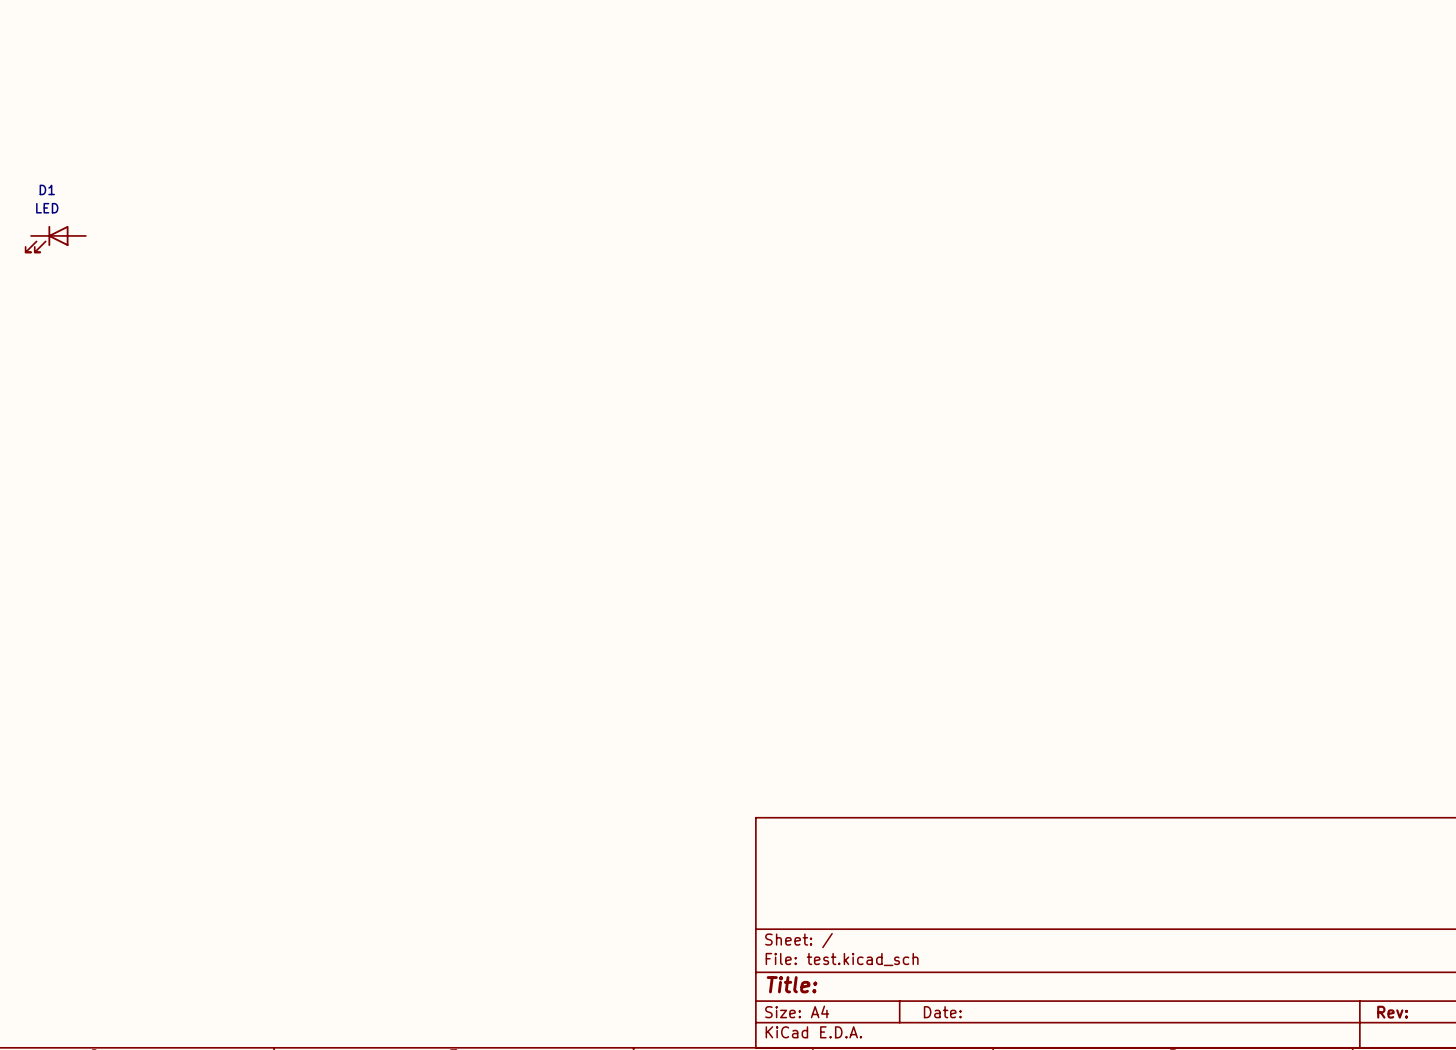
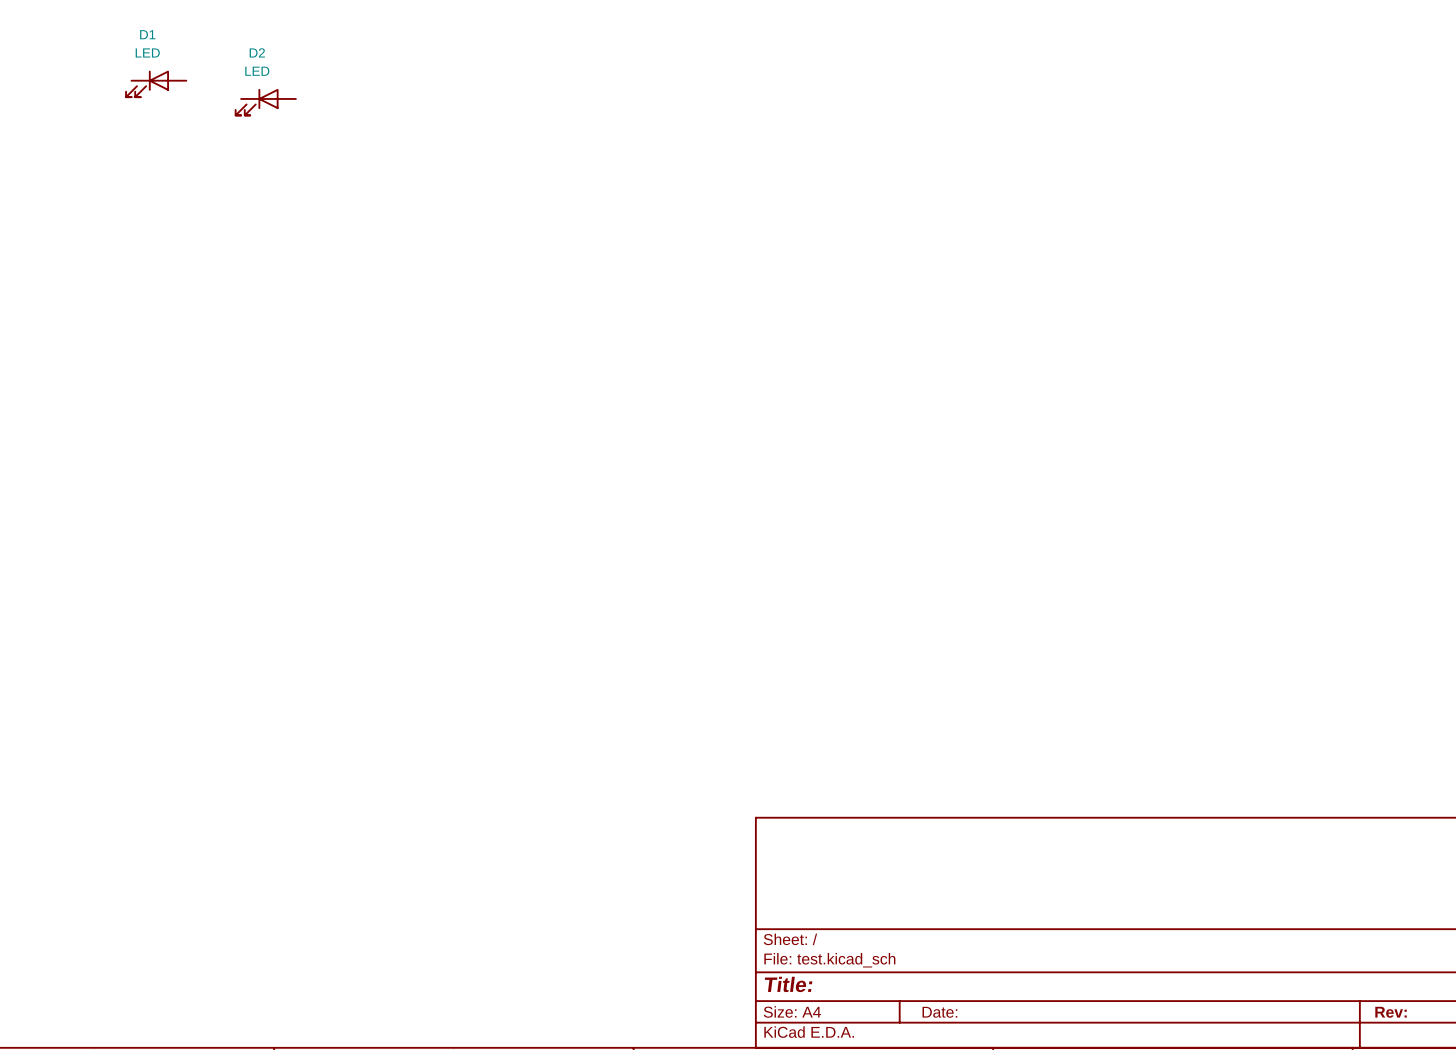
D2: none -> LED (265, 102)
D1 position: (55, 239) -> (156, 83)

